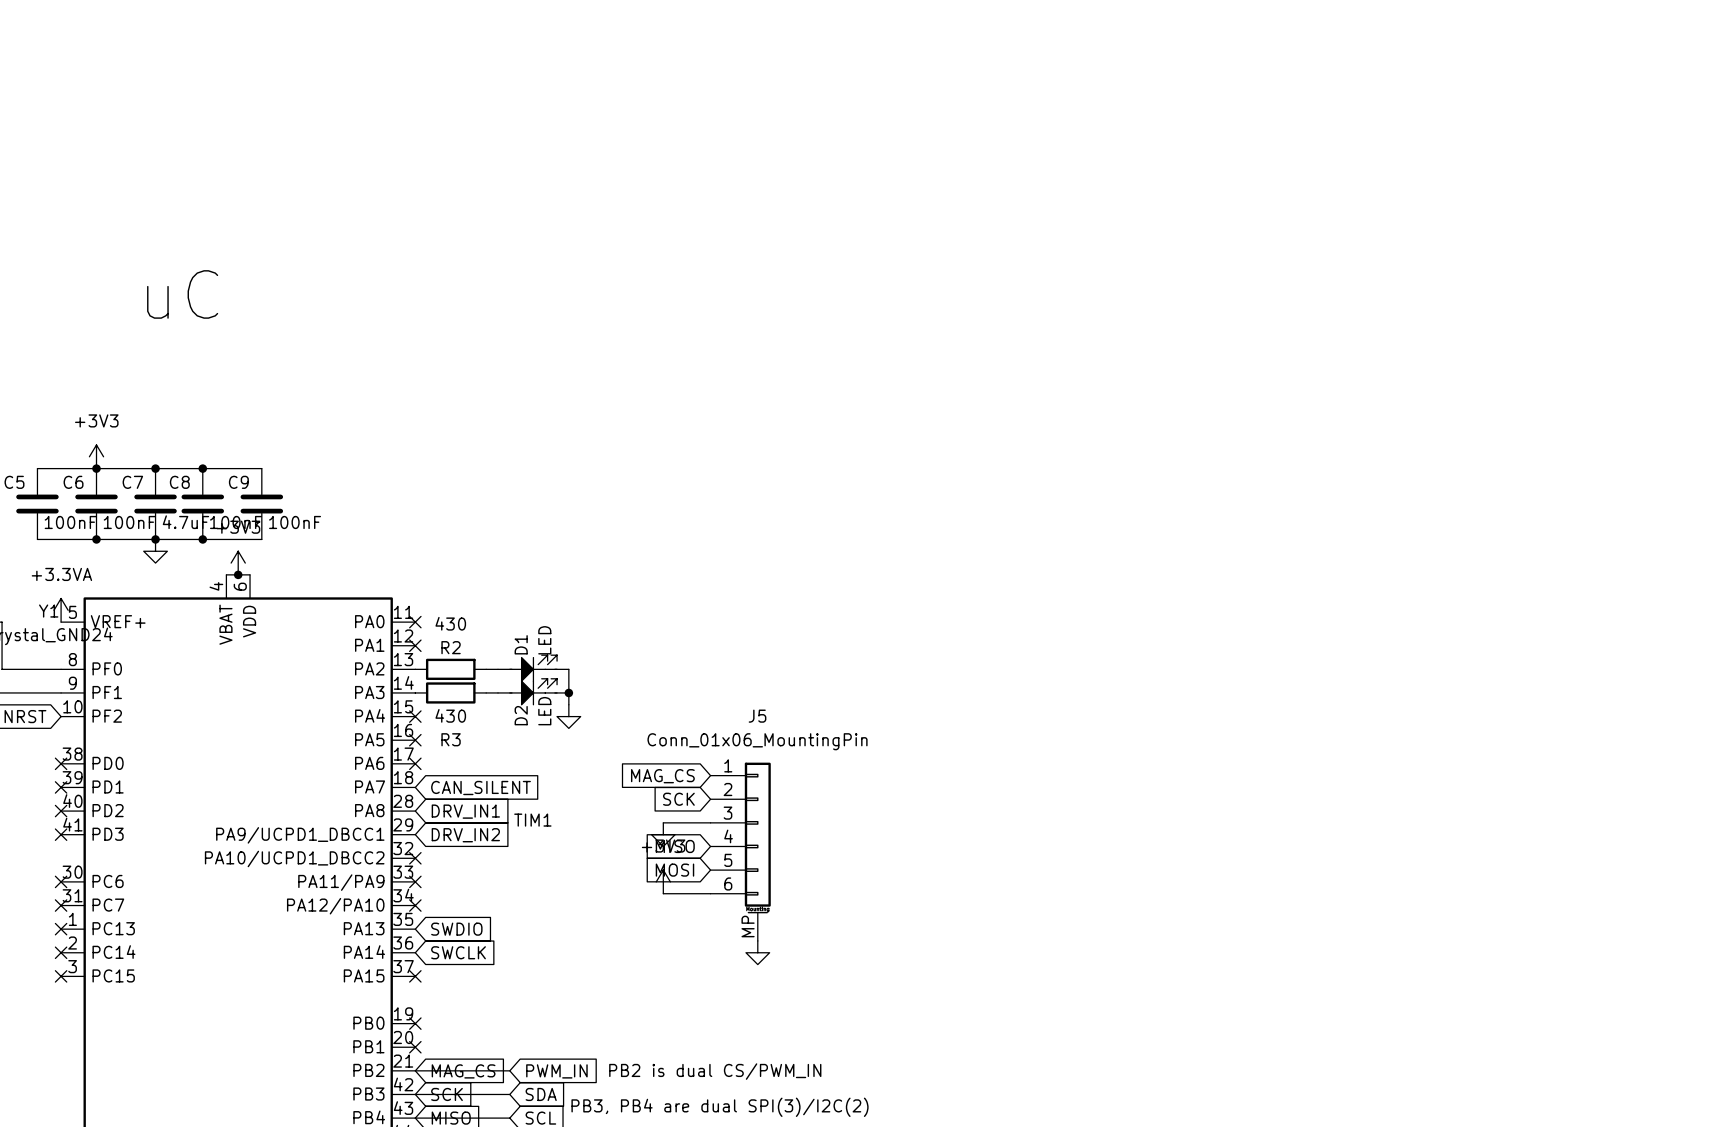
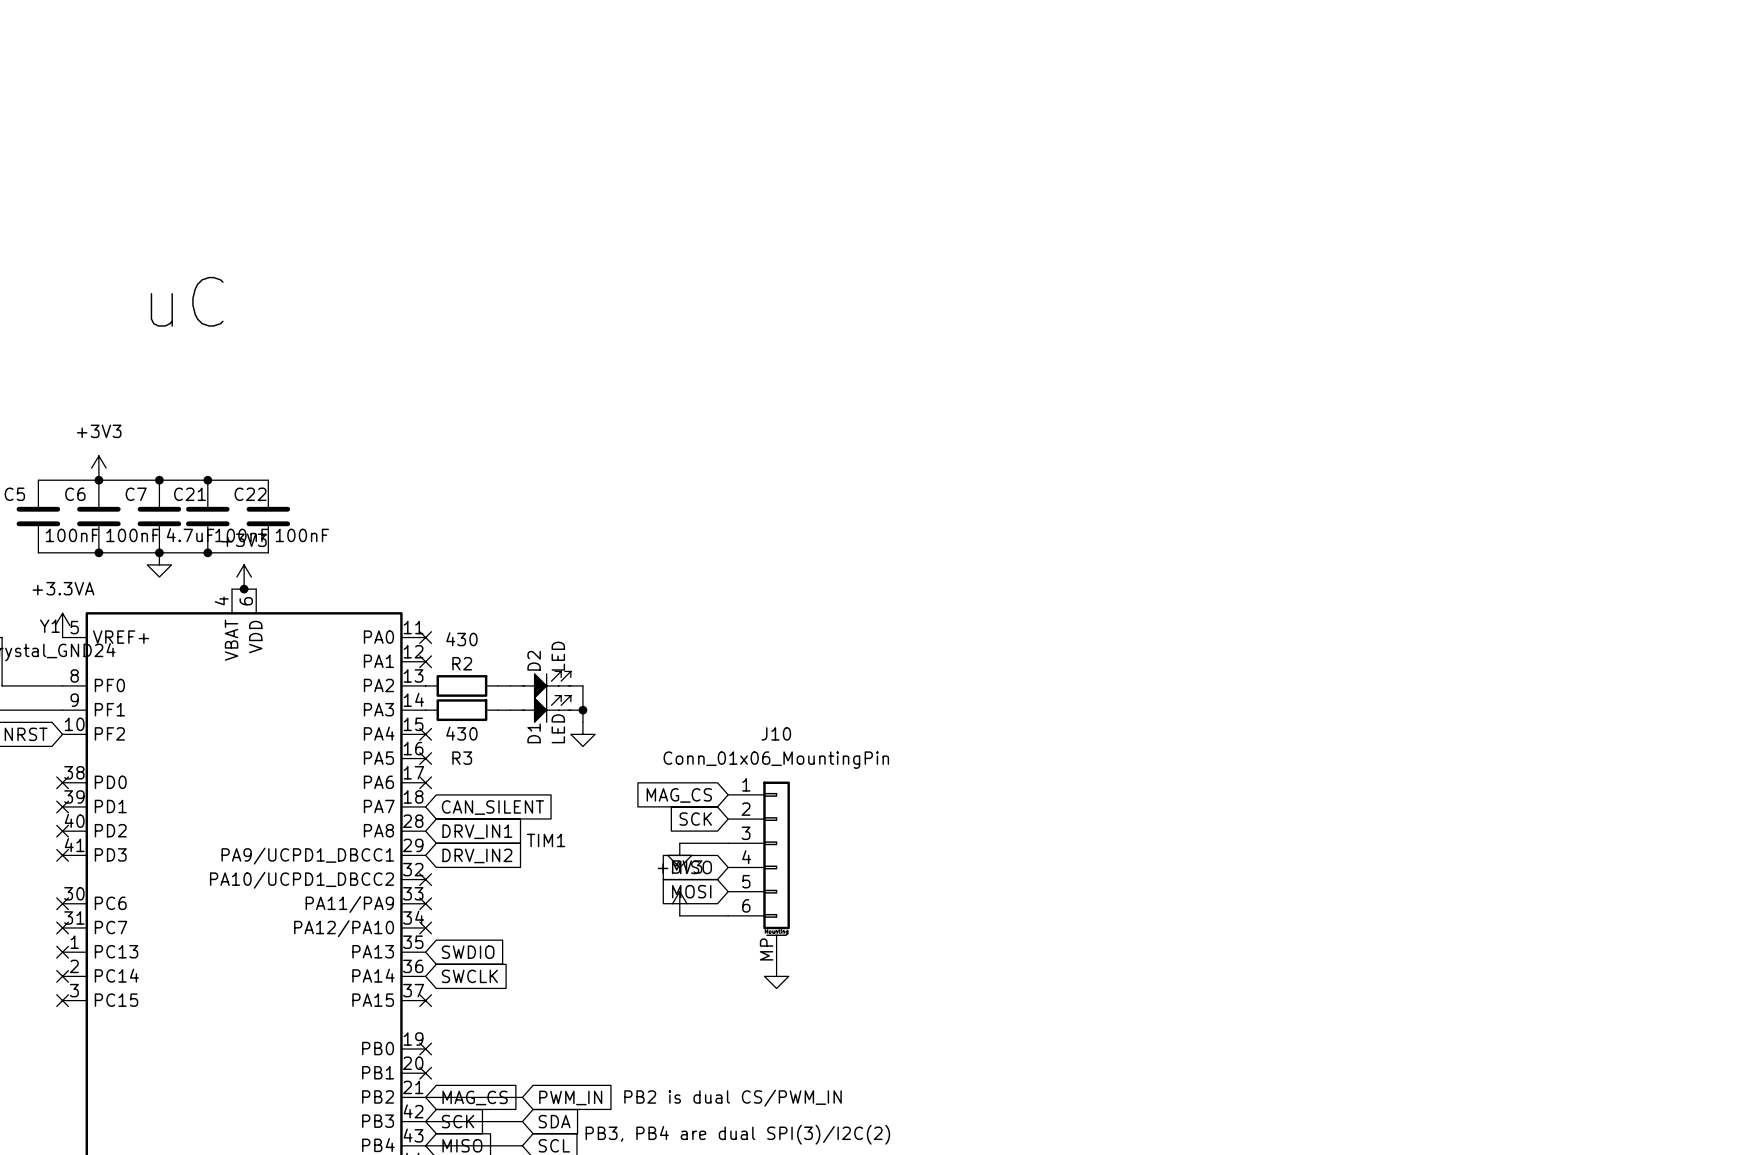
C8 name: C8 (179, 482) -> C21 (190, 494)
C9 name: C9 (238, 482) -> C22 (250, 494)
D1 name: D1 (521, 644) -> D2 (534, 660)
D2 name: D2 (521, 715) -> D1 (534, 733)
J5 name: J5 (757, 716) -> J10 (776, 733)

